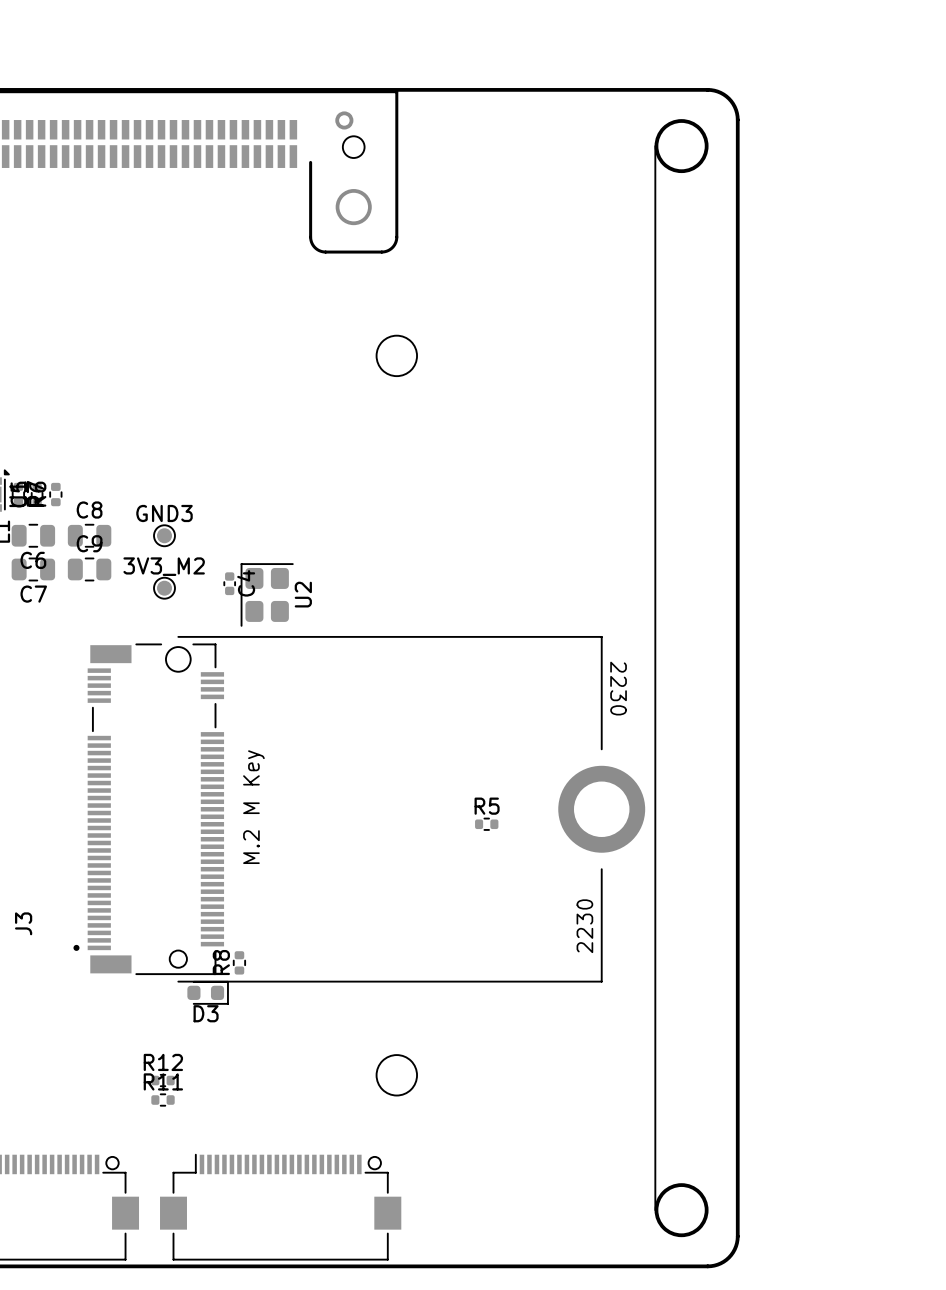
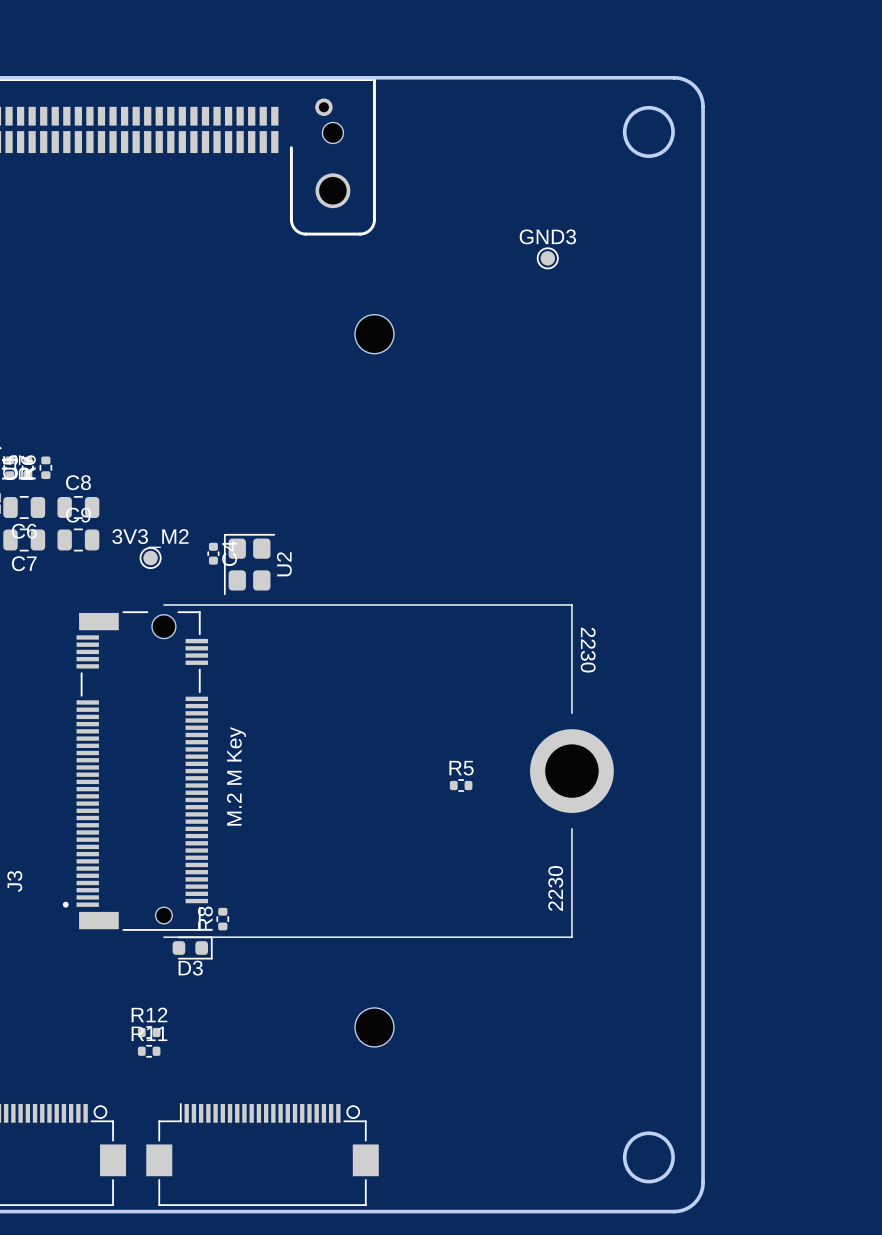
line: (655, 146) (655, 1210) -> none
GND3 position: (164, 535) -> (547, 258)

